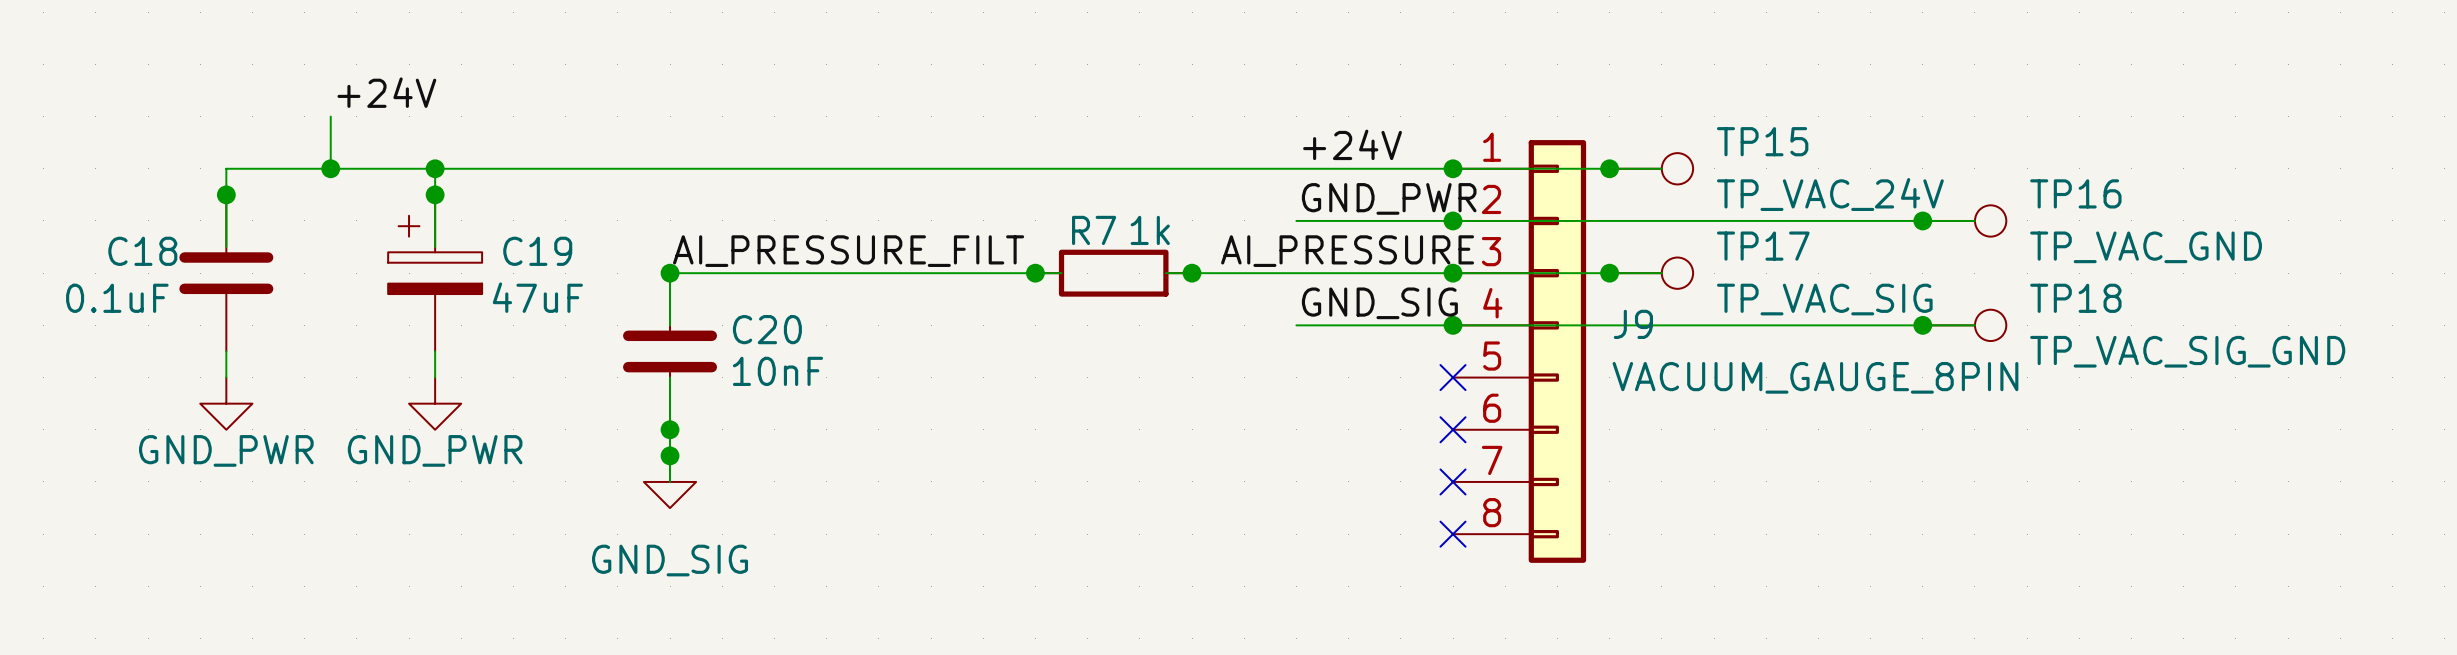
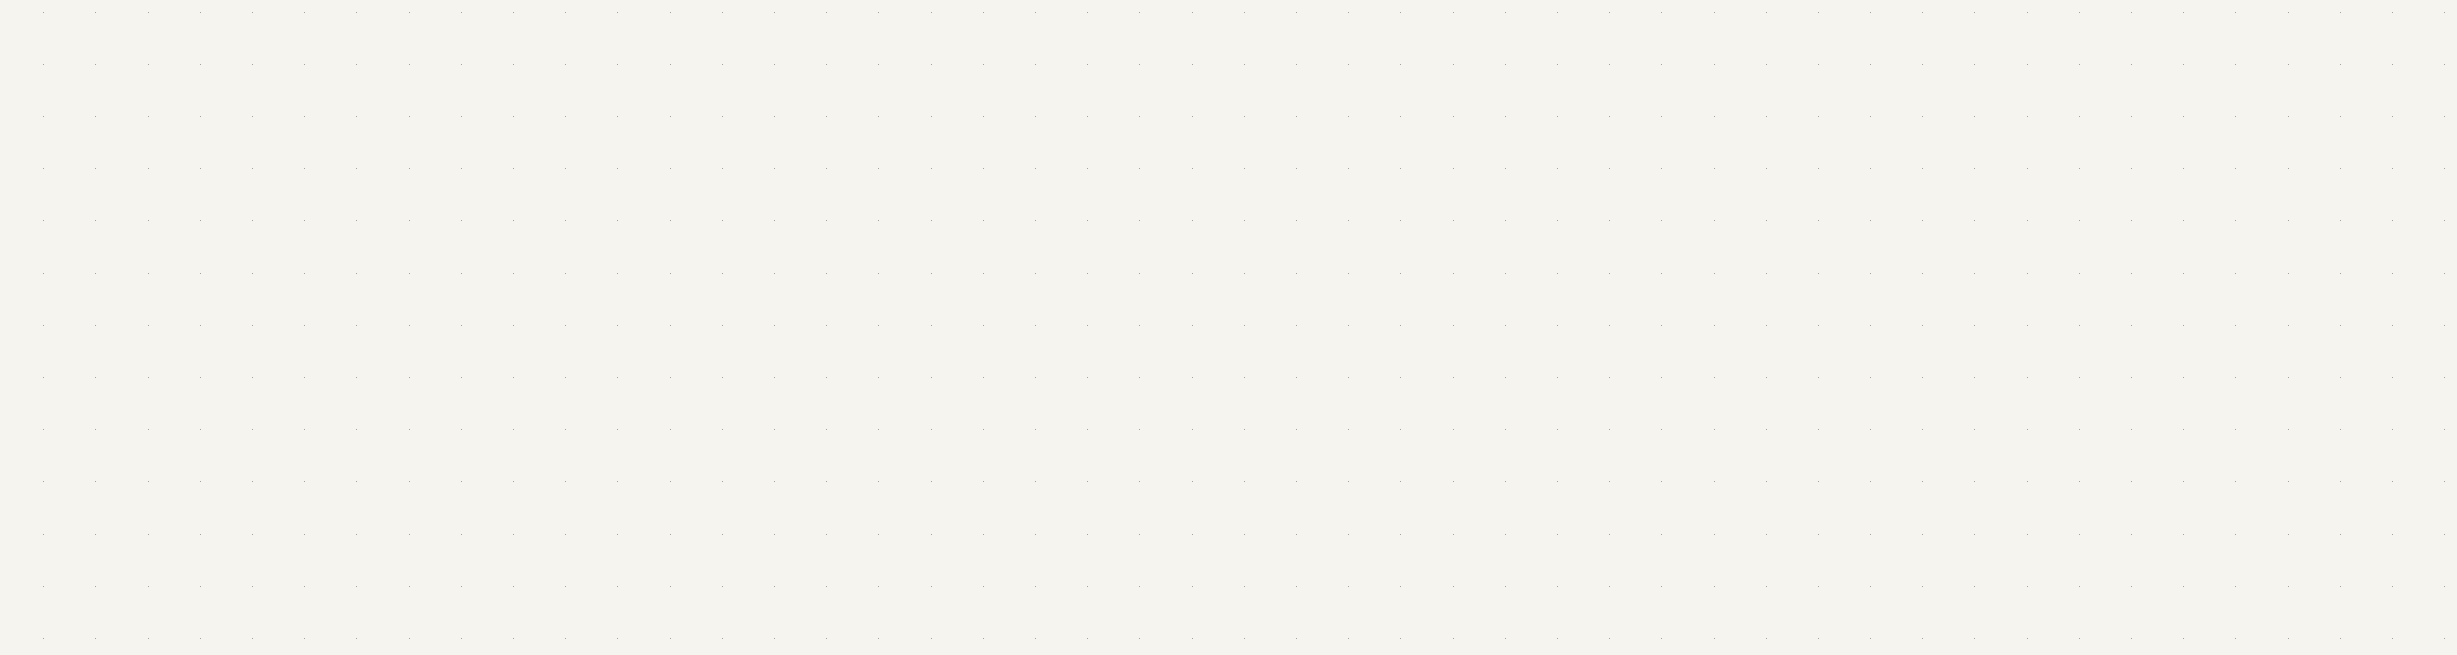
label: +24V (386, 92) -> none
wire: (330, 116) (330, 168) -> none
label: +24V (1352, 144) -> none
junction: (330, 168) -> none
wire: (435, 168) (435, 247) -> none
junction: (435, 168) -> none
junction: (1453, 168) -> none
junction: (1609, 168) -> none
TP15: TP_VAC_24V (1651, 168) -> none
wire: (1661, 168) (226, 168) (226, 247) -> none
junction: (226, 194) -> none
junction: (435, 194) -> none
label: GND_PWR (1389, 198) -> none
wire: (1296, 220) (1974, 220) -> none
junction: (1453, 220) -> none
junction: (1922, 220) -> none
TP16: TP_VAC_GND (1964, 220) -> none
label: AI_PRESSURE_FILT (848, 251) -> none
label: AI_PRESSURE (1347, 251) -> none
C18: 0.1uF (226, 273) -> none
C19: 47uF (435, 273) -> none
junction: (670, 273) -> none
junction: (1035, 273) -> none
wire: (1061, 273) (670, 273) (670, 325) -> none
R7: 1k (1113, 273) -> none
wire: (1165, 273) (1661, 273) -> none
junction: (1192, 273) -> none
junction: (1453, 273) -> none
junction: (1609, 273) -> none
TP17: TP_VAC_SIG (1651, 273) -> none
label: GND_SIG (1379, 303) -> none
wire: (1296, 325) (1974, 325) -> none
junction: (1453, 325) -> none
junction: (1922, 325) -> none
TP18: TP_VAC_SIG_GND (1964, 325) -> none
wire: (226, 351) (226, 377) -> none
wire: (435, 351) (435, 377) -> none
C20: 10nF (670, 351) -> none
J9: VACUUM_GAUGE_8PIN (1519, 351) -> none
wire: (670, 377) (670, 481) -> none
no-connect mark: (1453, 377) -> none
power symbol: GND_PWR (226, 403) -> none
power symbol: GND_PWR (435, 403) -> none
junction: (670, 429) -> none
no-connect mark: (1453, 429) -> none
junction: (670, 455) -> none
power symbol: GND_SIG (670, 481) -> none
no-connect mark: (1453, 481) -> none
no-connect mark: (1453, 534) -> none

